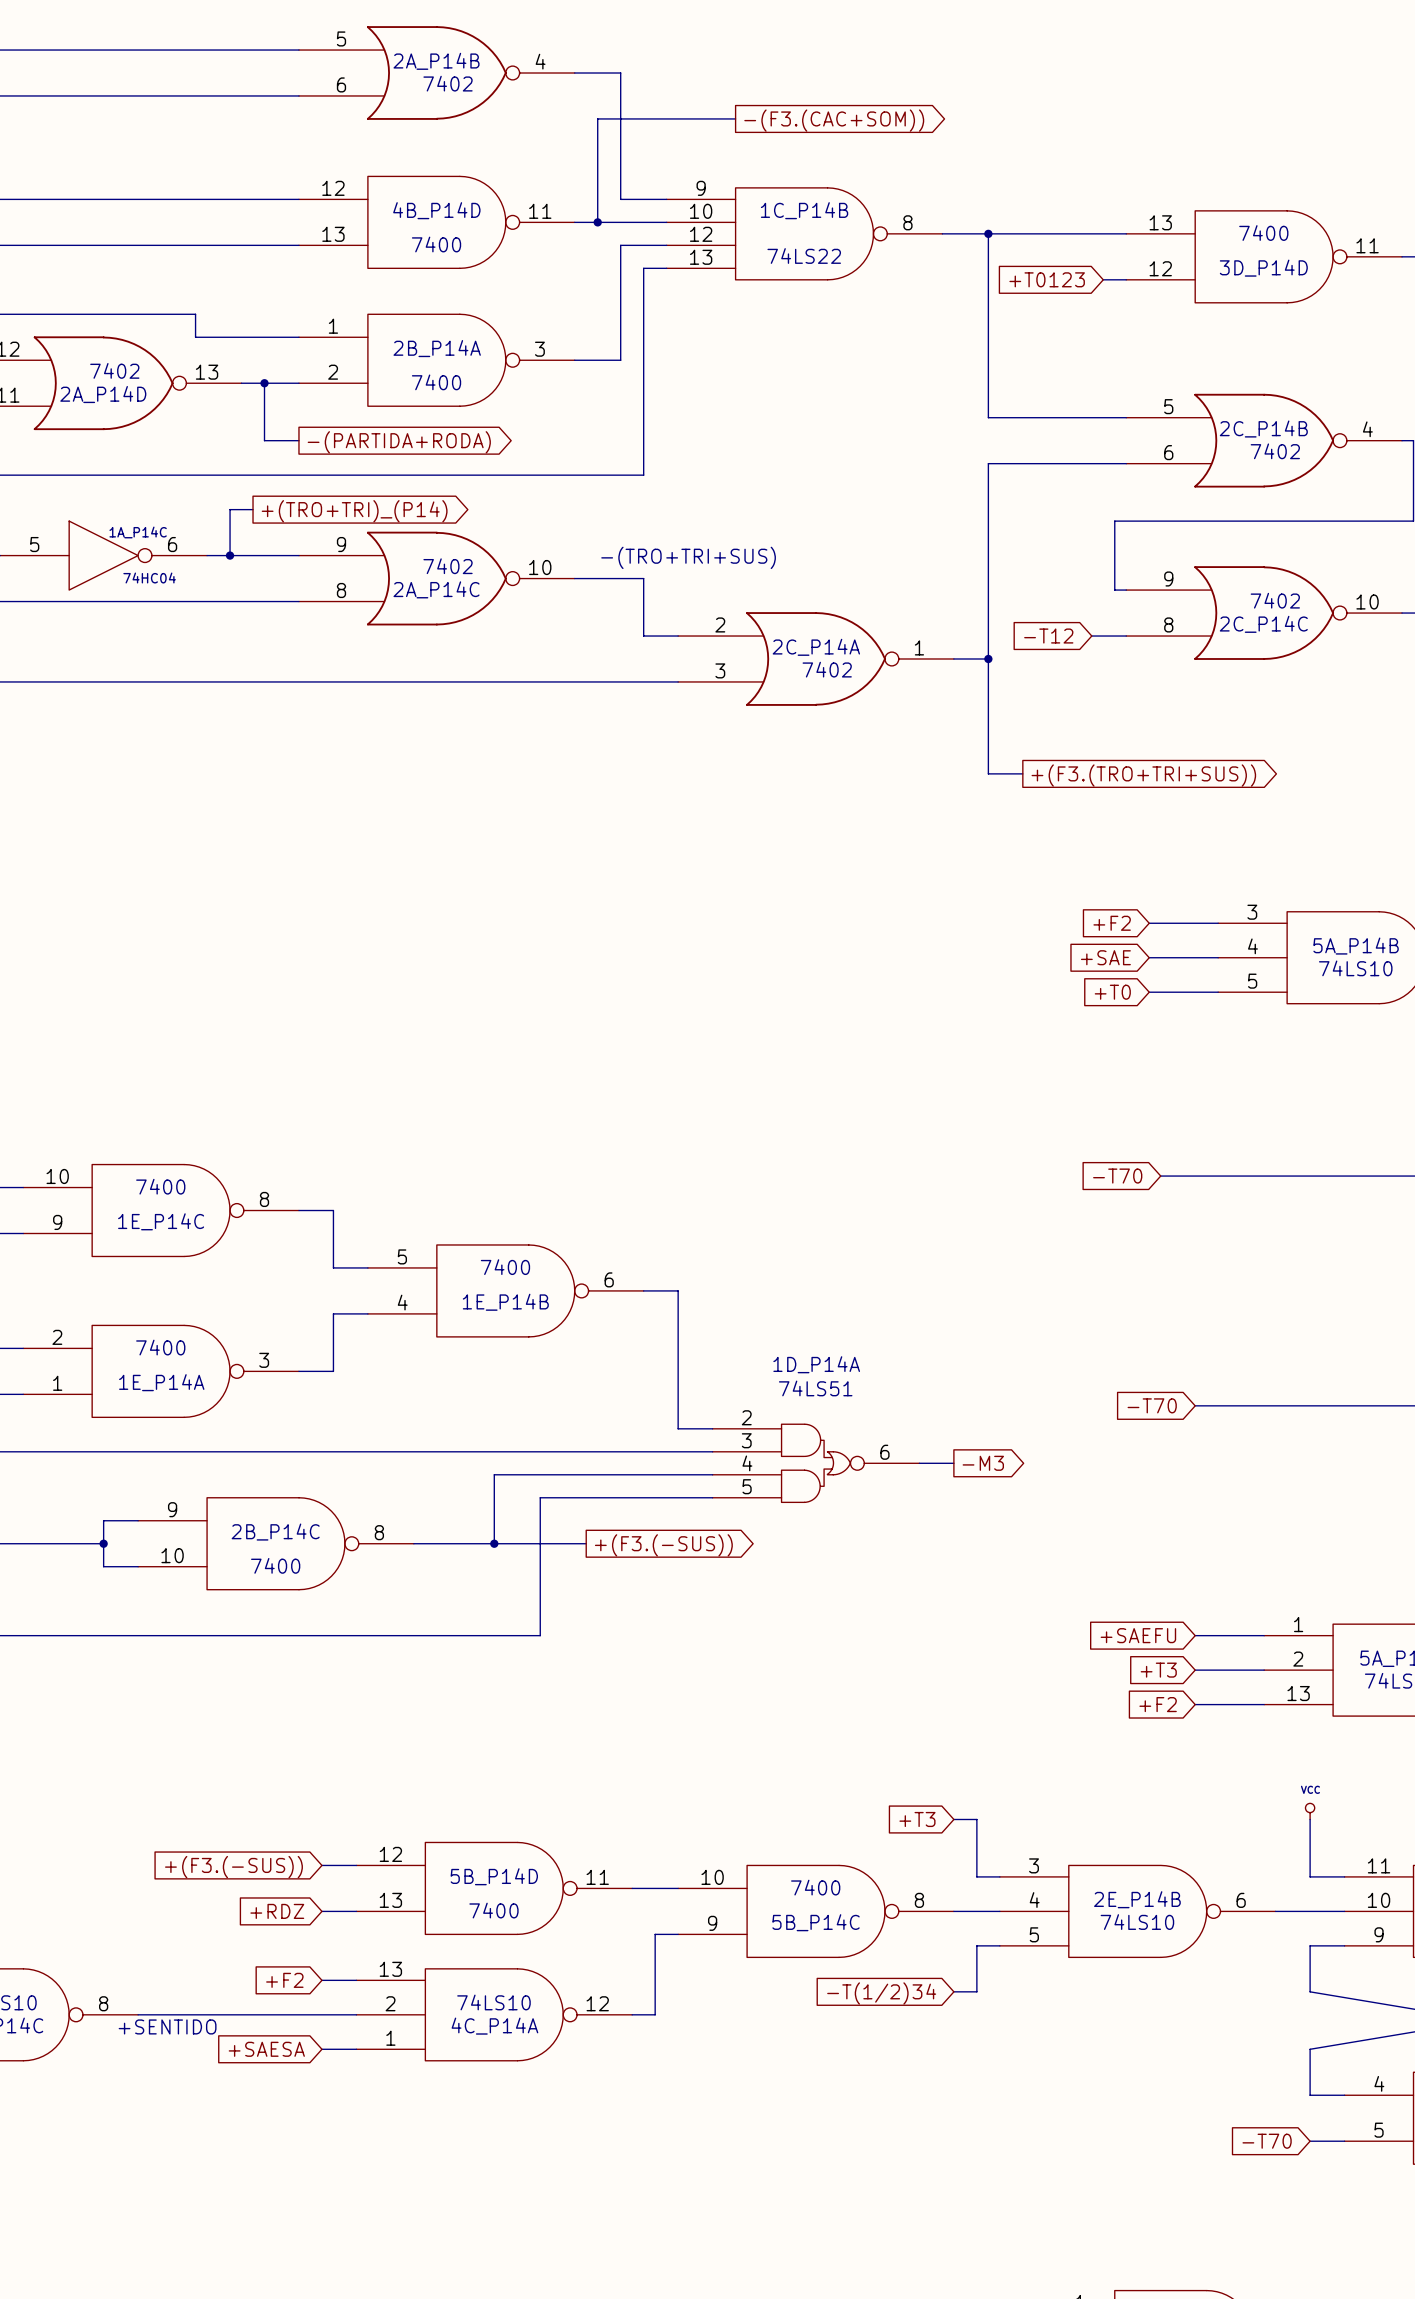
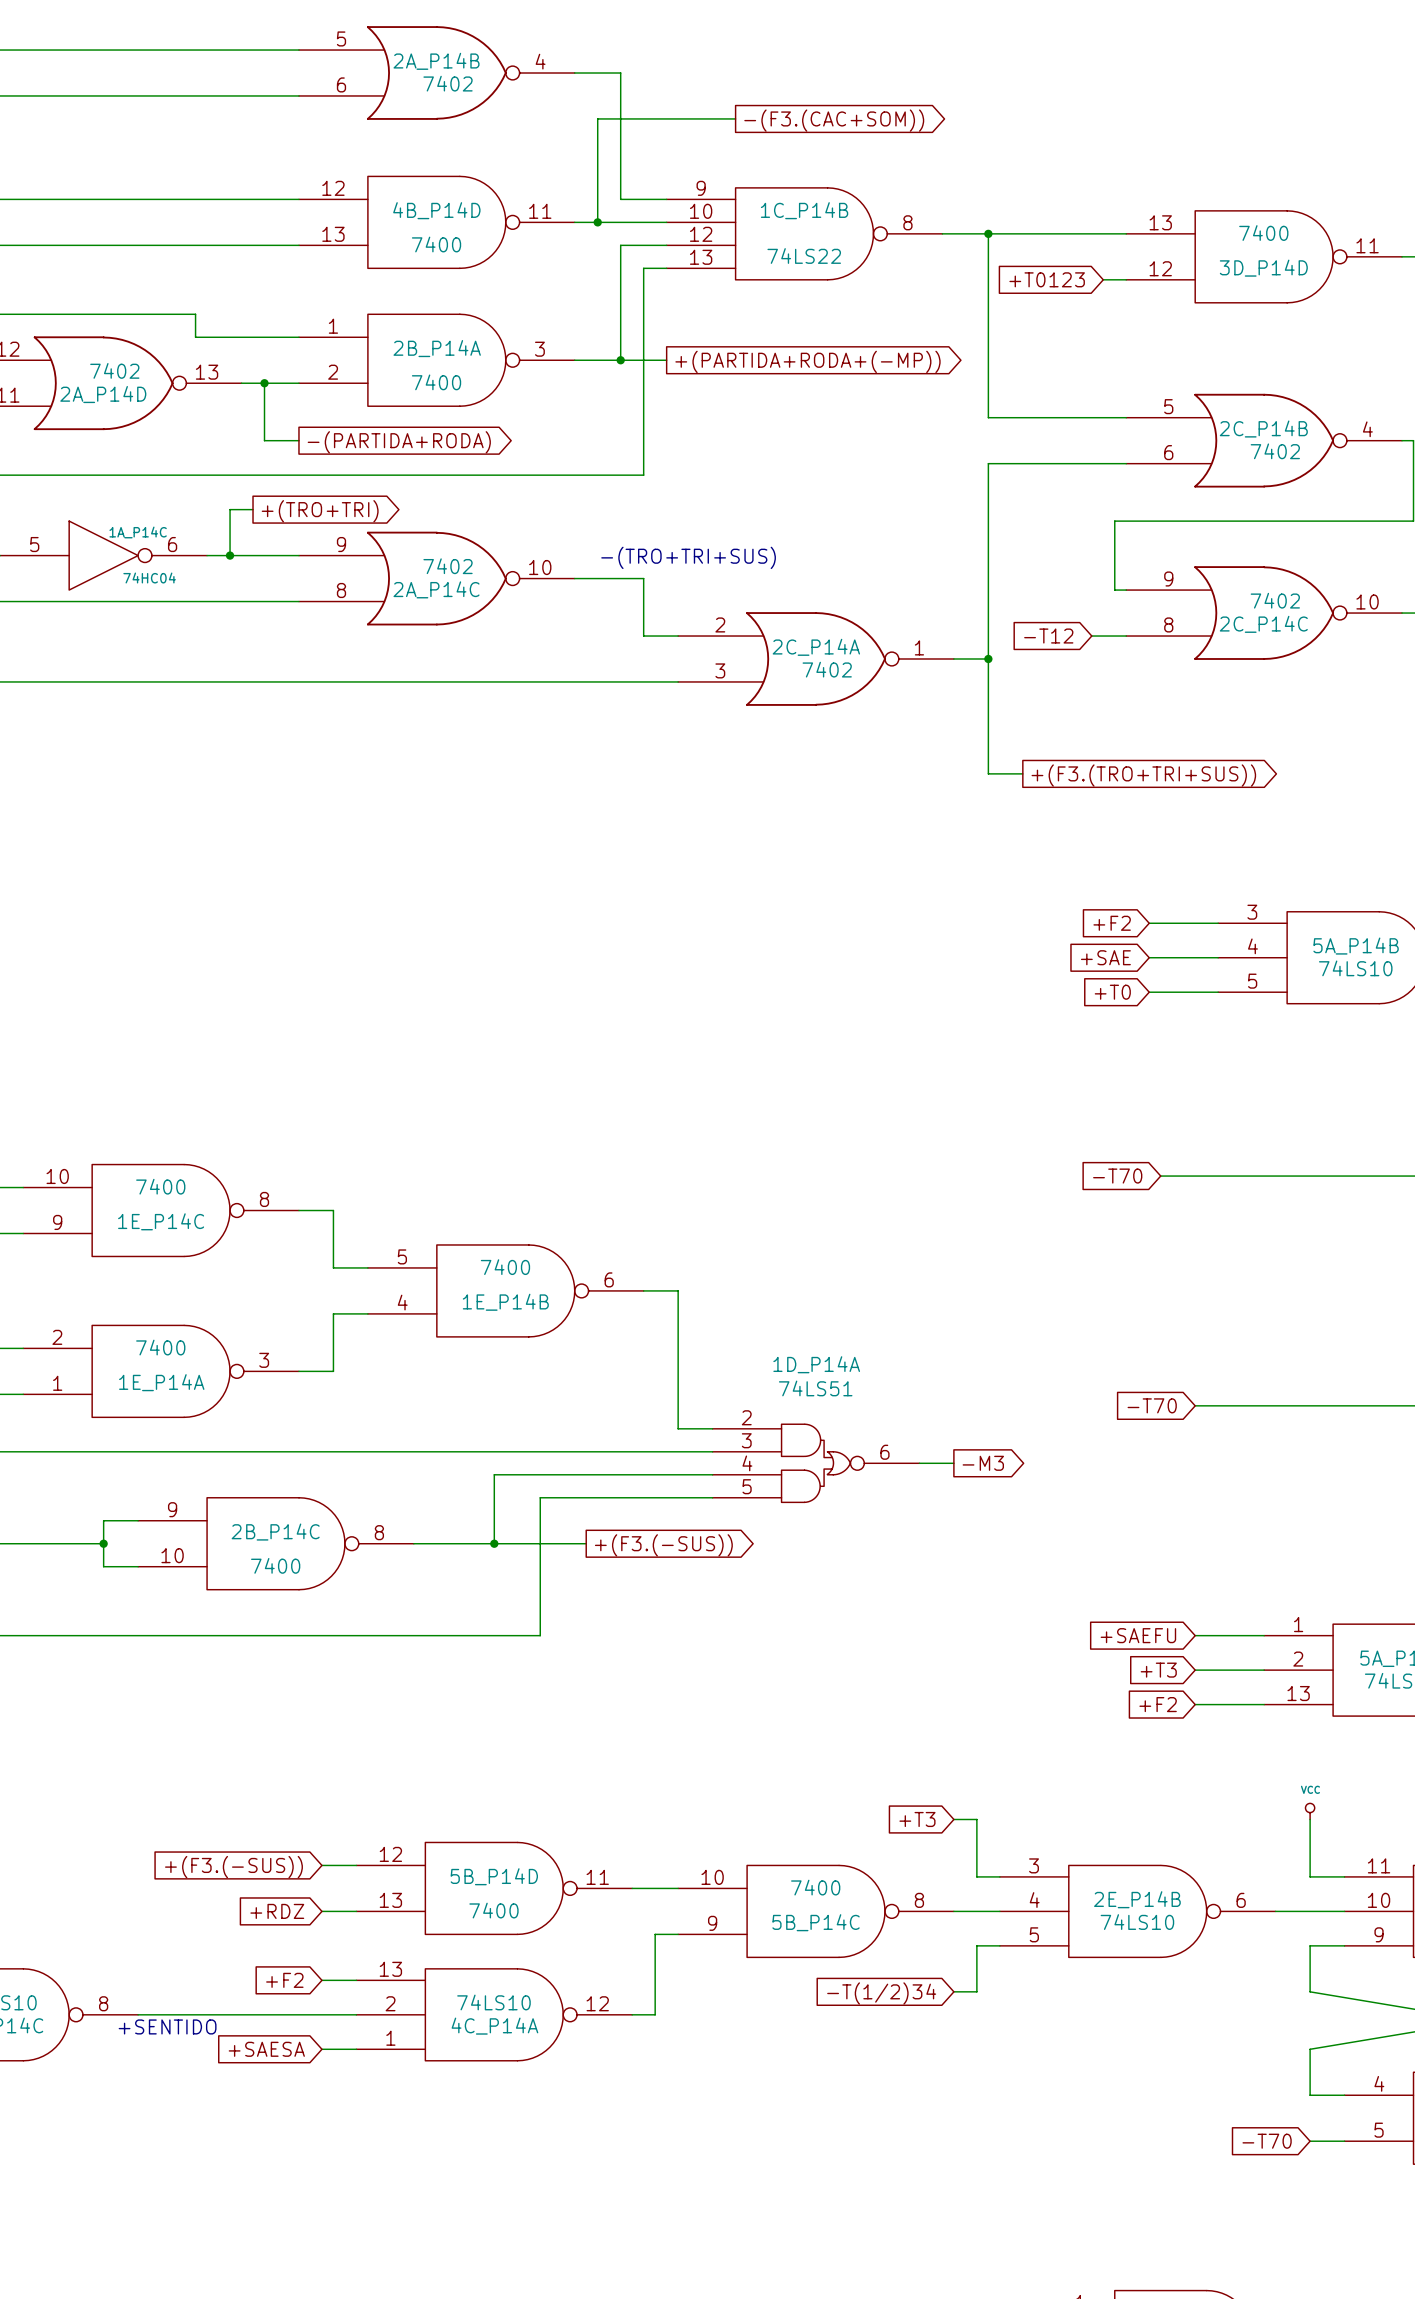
wire: none -> (620, 360) (666, 360)
junction: none -> (620, 360)
global label: none -> +(PARTIDA+RODA+(-MP)) (807, 361)
global label: +(TRO+TRI)_(P14) (354, 511) -> +(TRO+TRI) (320, 511)

